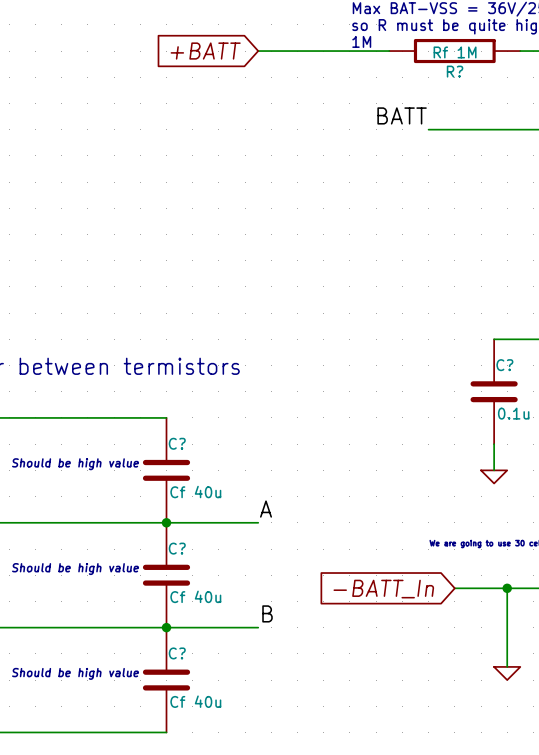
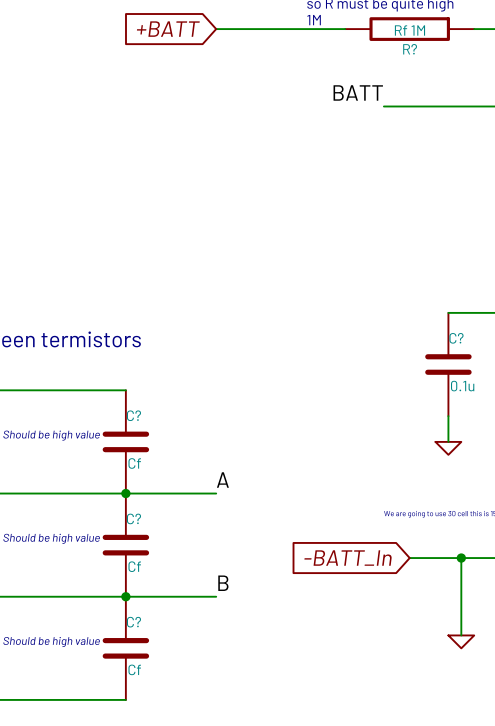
C? value: Cf 40u (195, 492) -> Cf (134, 463)
C? value: Cf 40u (195, 596) -> Cf (134, 566)
C? value: Cf 40u (195, 701) -> Cf (134, 669)

